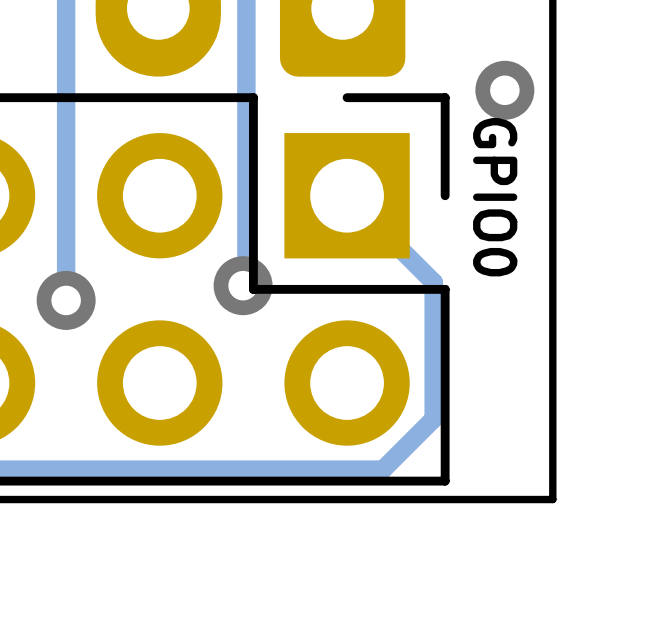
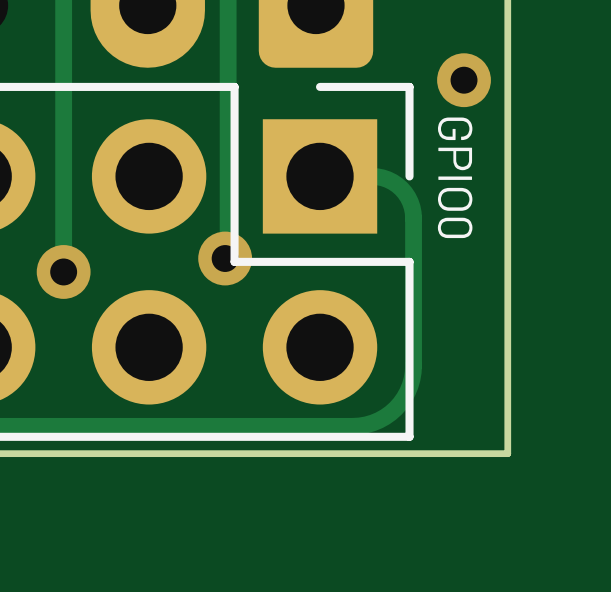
track: (347, 195) (433, 282) (433, 418) (382, 469) -> (320, 176) (371, 176) (387, 179) (404, 192) (413, 212) (412, 379) (404, 397) (390, 413) (372, 422) (352, 426)

